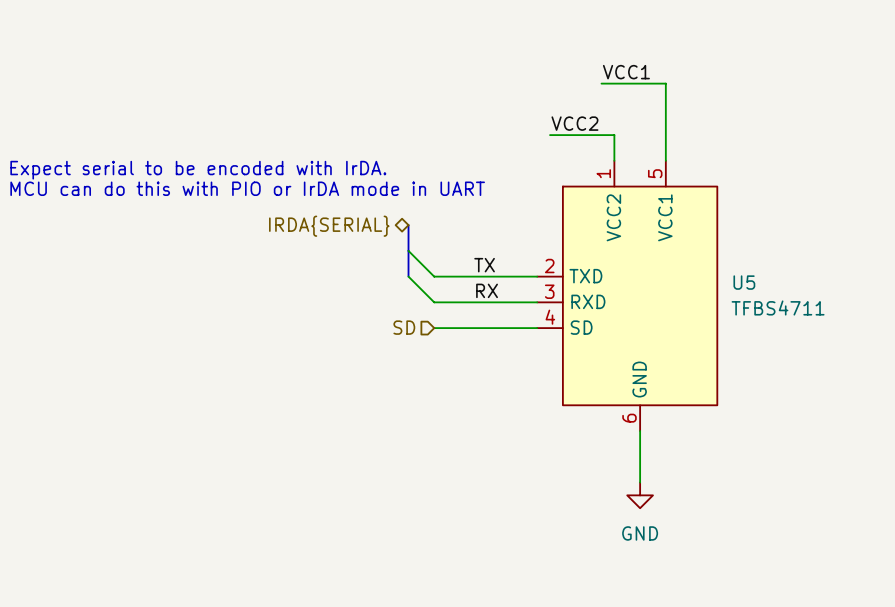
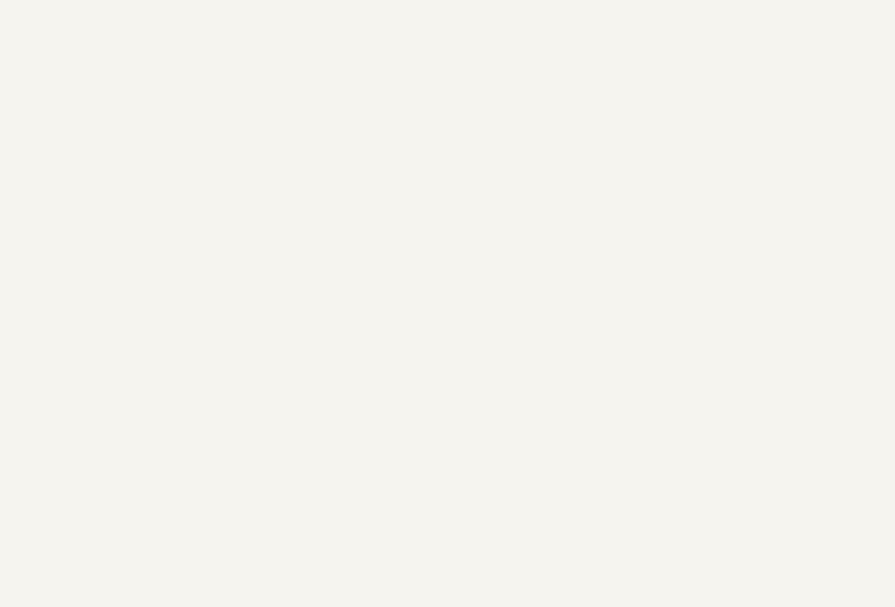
label: VCC1 (626, 72) -> none
wire: (601, 83) (665, 83) (665, 160) -> none
label: VCC2 (574, 123) -> none
wire: (550, 135) (614, 135) (614, 160) -> none
text: Expect serial to be encoded with IrDA. (198, 170) -> none
text: MCU can do this with PIO or IrDA mode in UART (247, 188) -> none
bus: (408, 225) (408, 276) -> none
hierarchical label: IRDA{SERIAL} (329, 226) -> none
wire: (408, 250) (434, 276) (537, 276) -> none
label: TX (484, 265) -> none
wire: (408, 276) (434, 302) (537, 302) -> none
label: RX (487, 290) -> none
U5: TFBS4711 (627, 295) -> none
hierarchical label: SD (404, 327) -> none
wire: (434, 328) (537, 328) -> none
wire: (640, 431) (640, 482) -> none
power symbol: GND (640, 495) -> none

